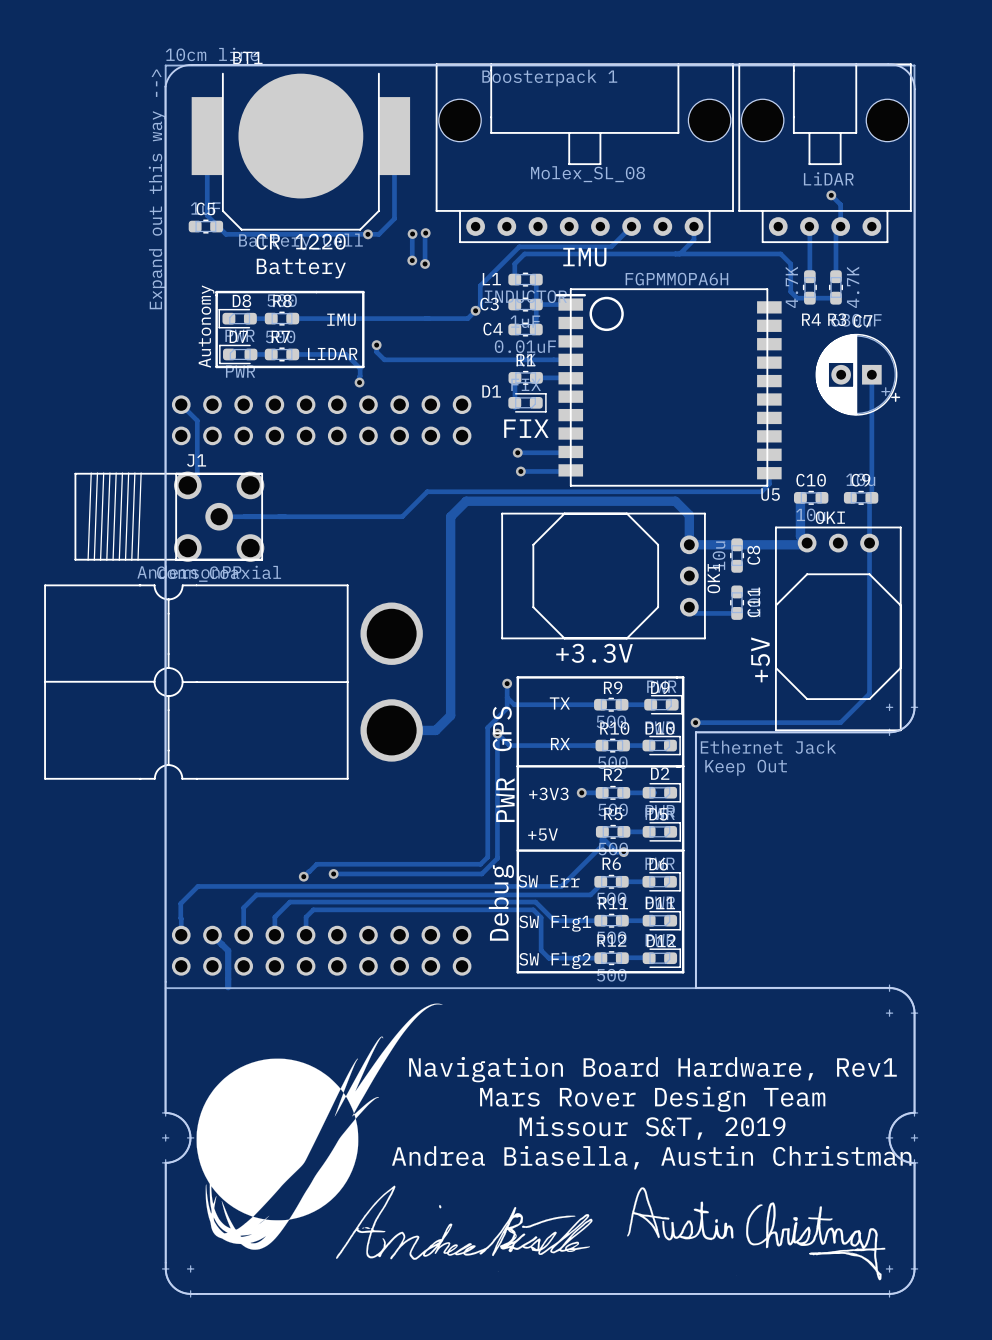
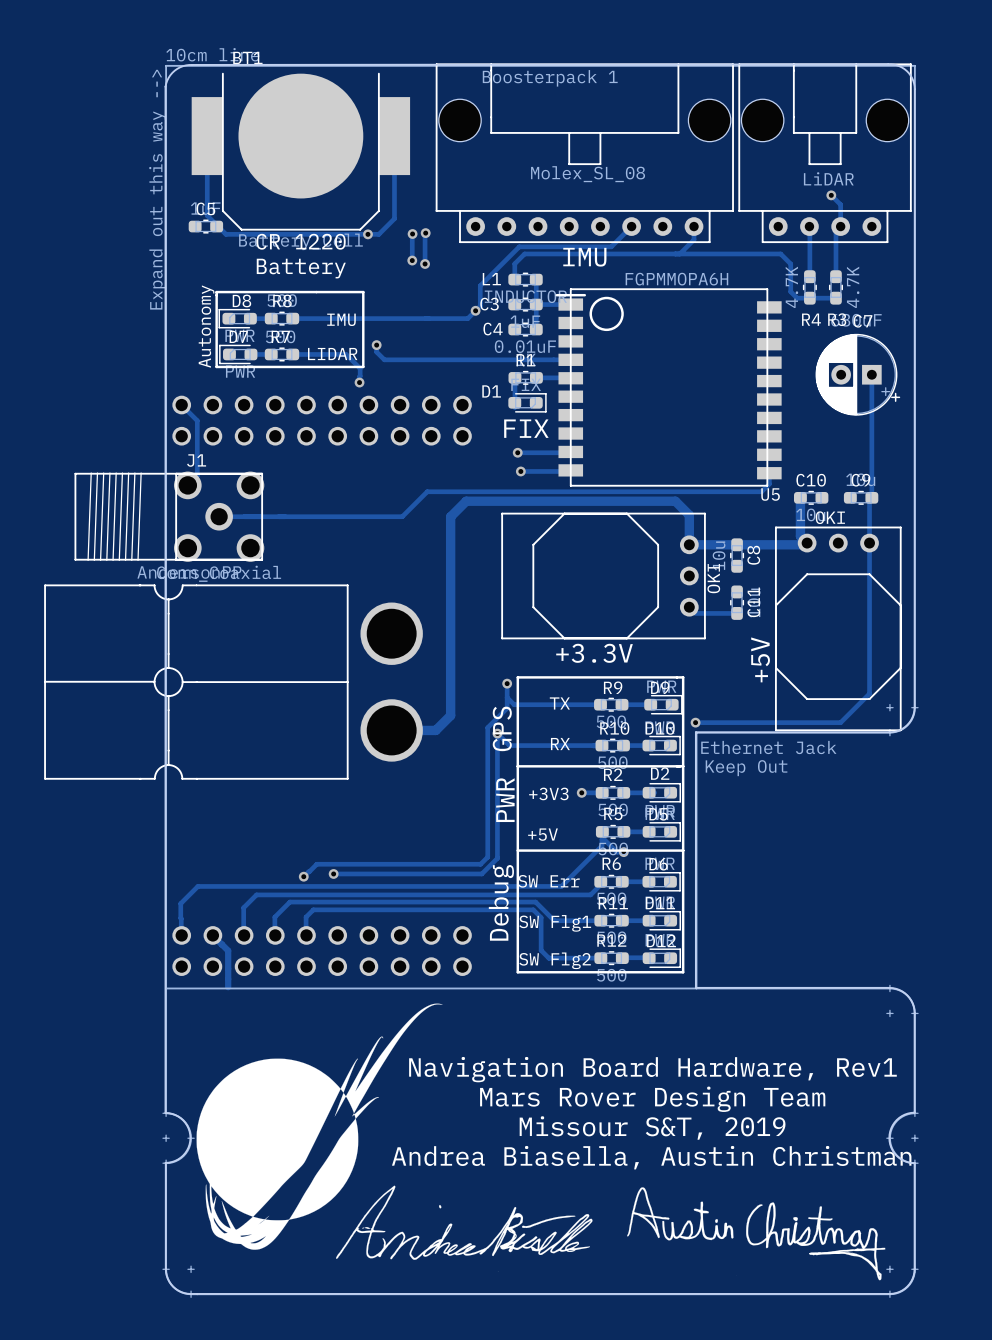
part footprint: [162, 64, 918, 1298] -> [162, 64, 919, 1298]

